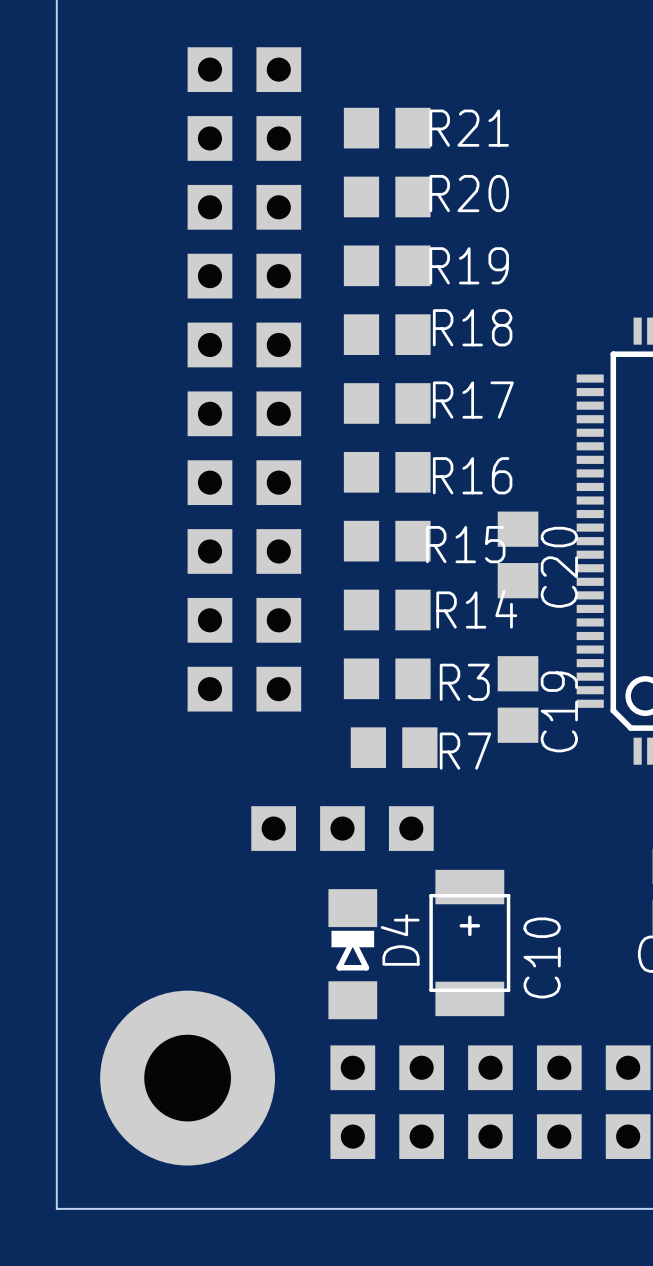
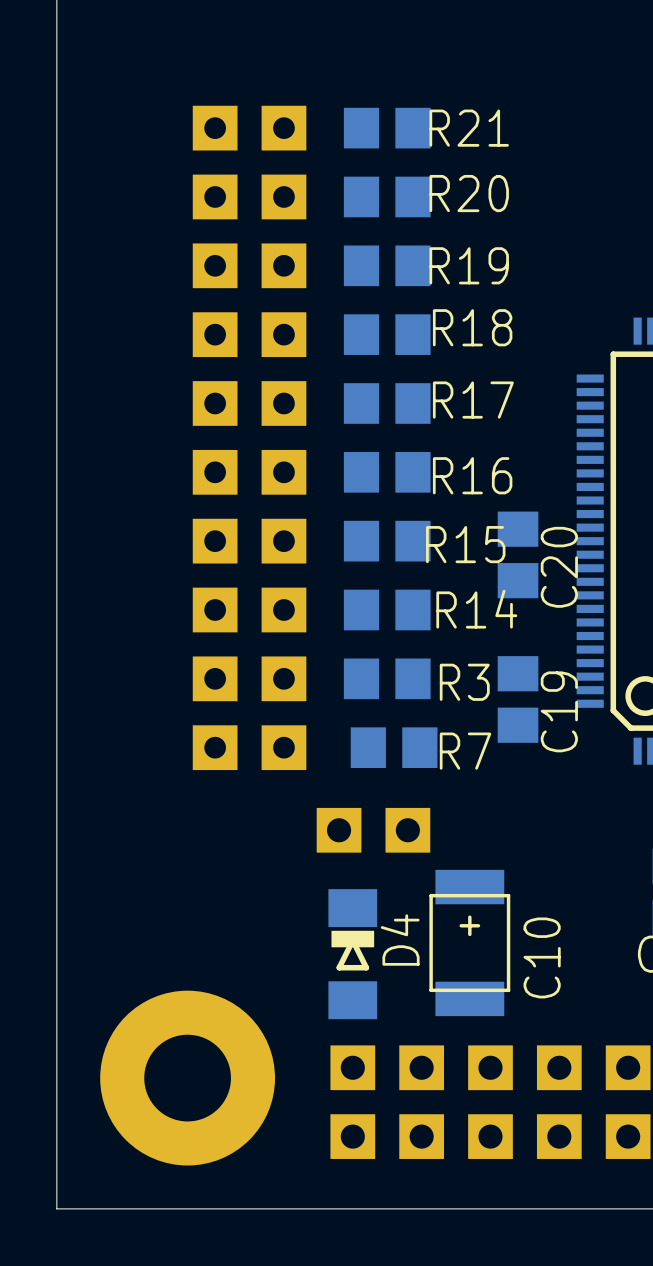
part: (244, 379) -> none
part: none -> (249, 437)
part: (342, 828) -> none
part: none -> (373, 830)

